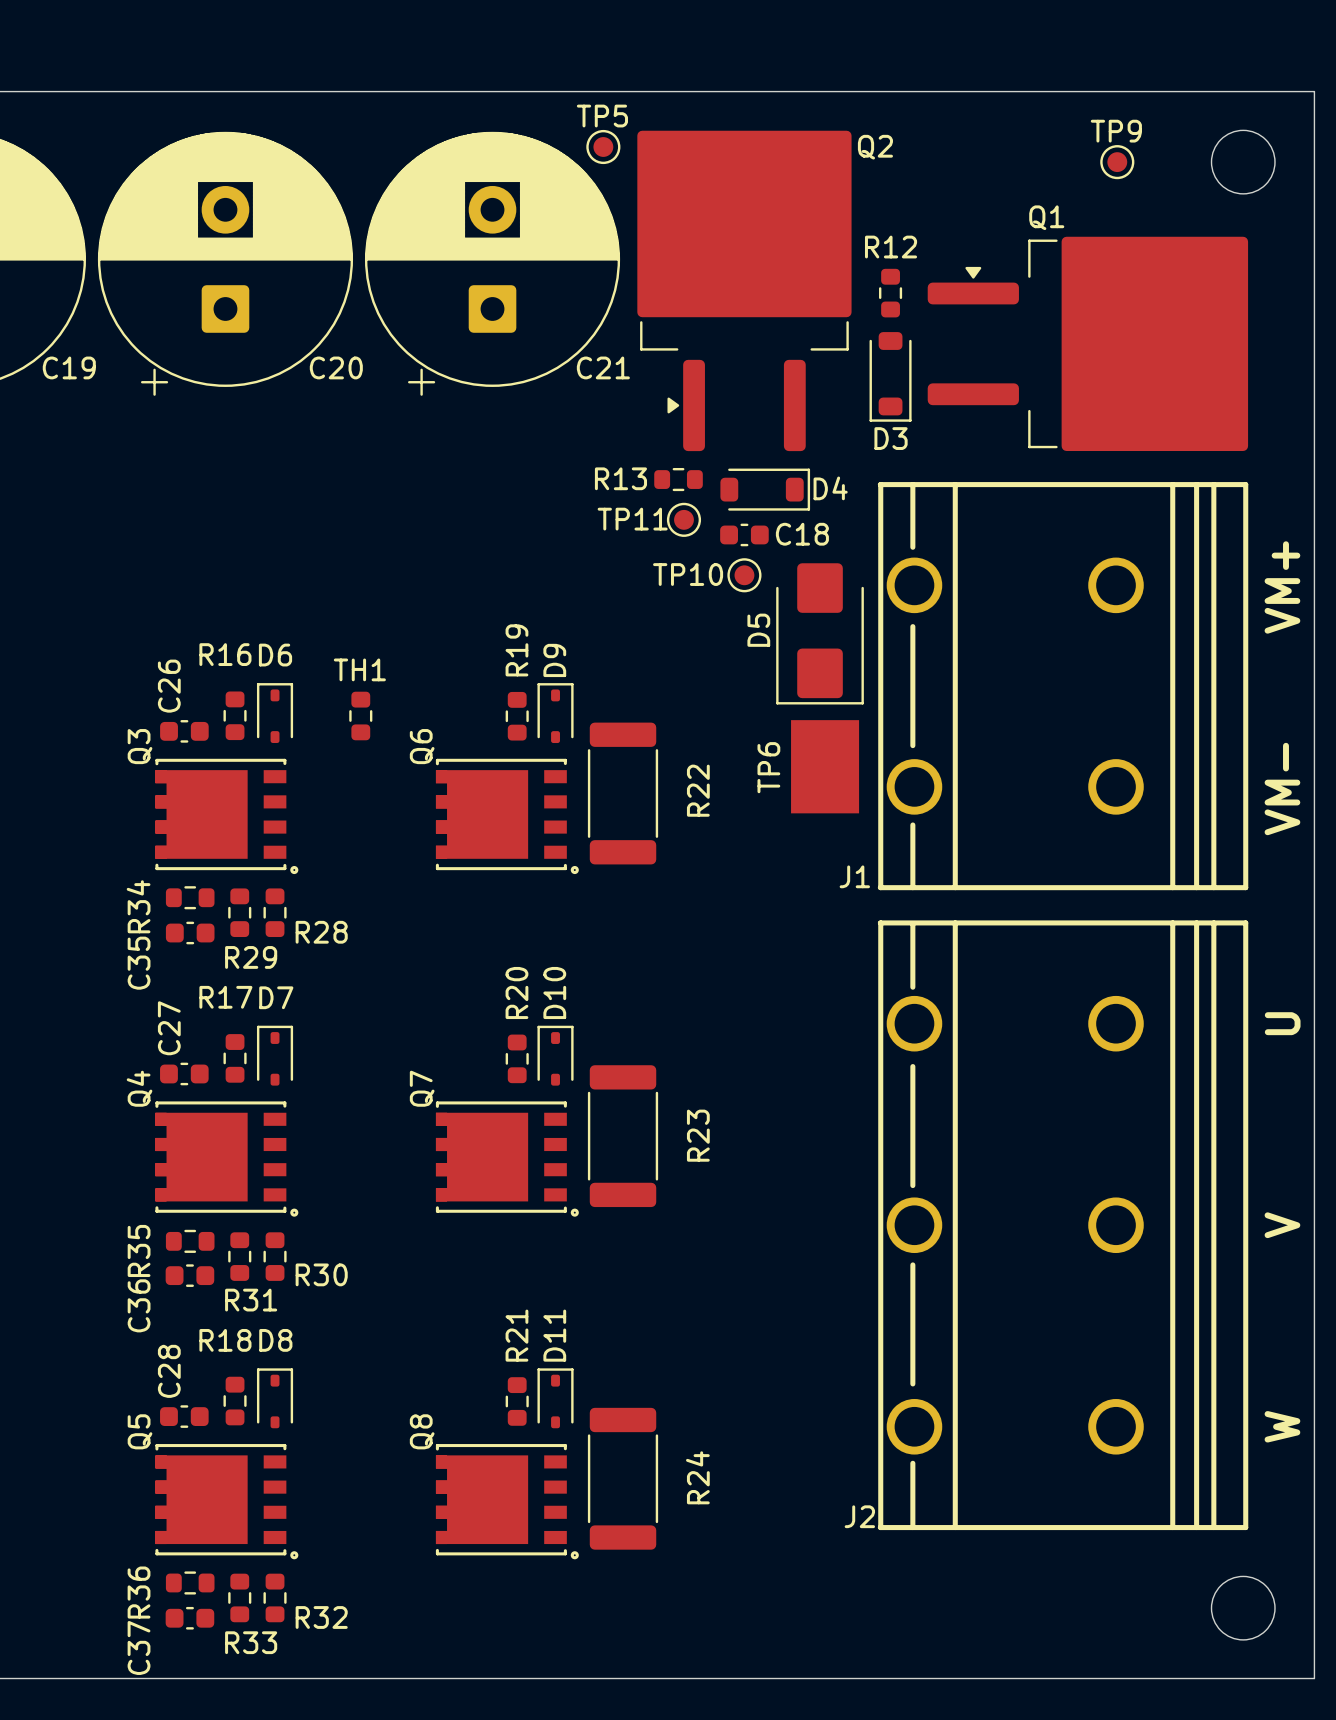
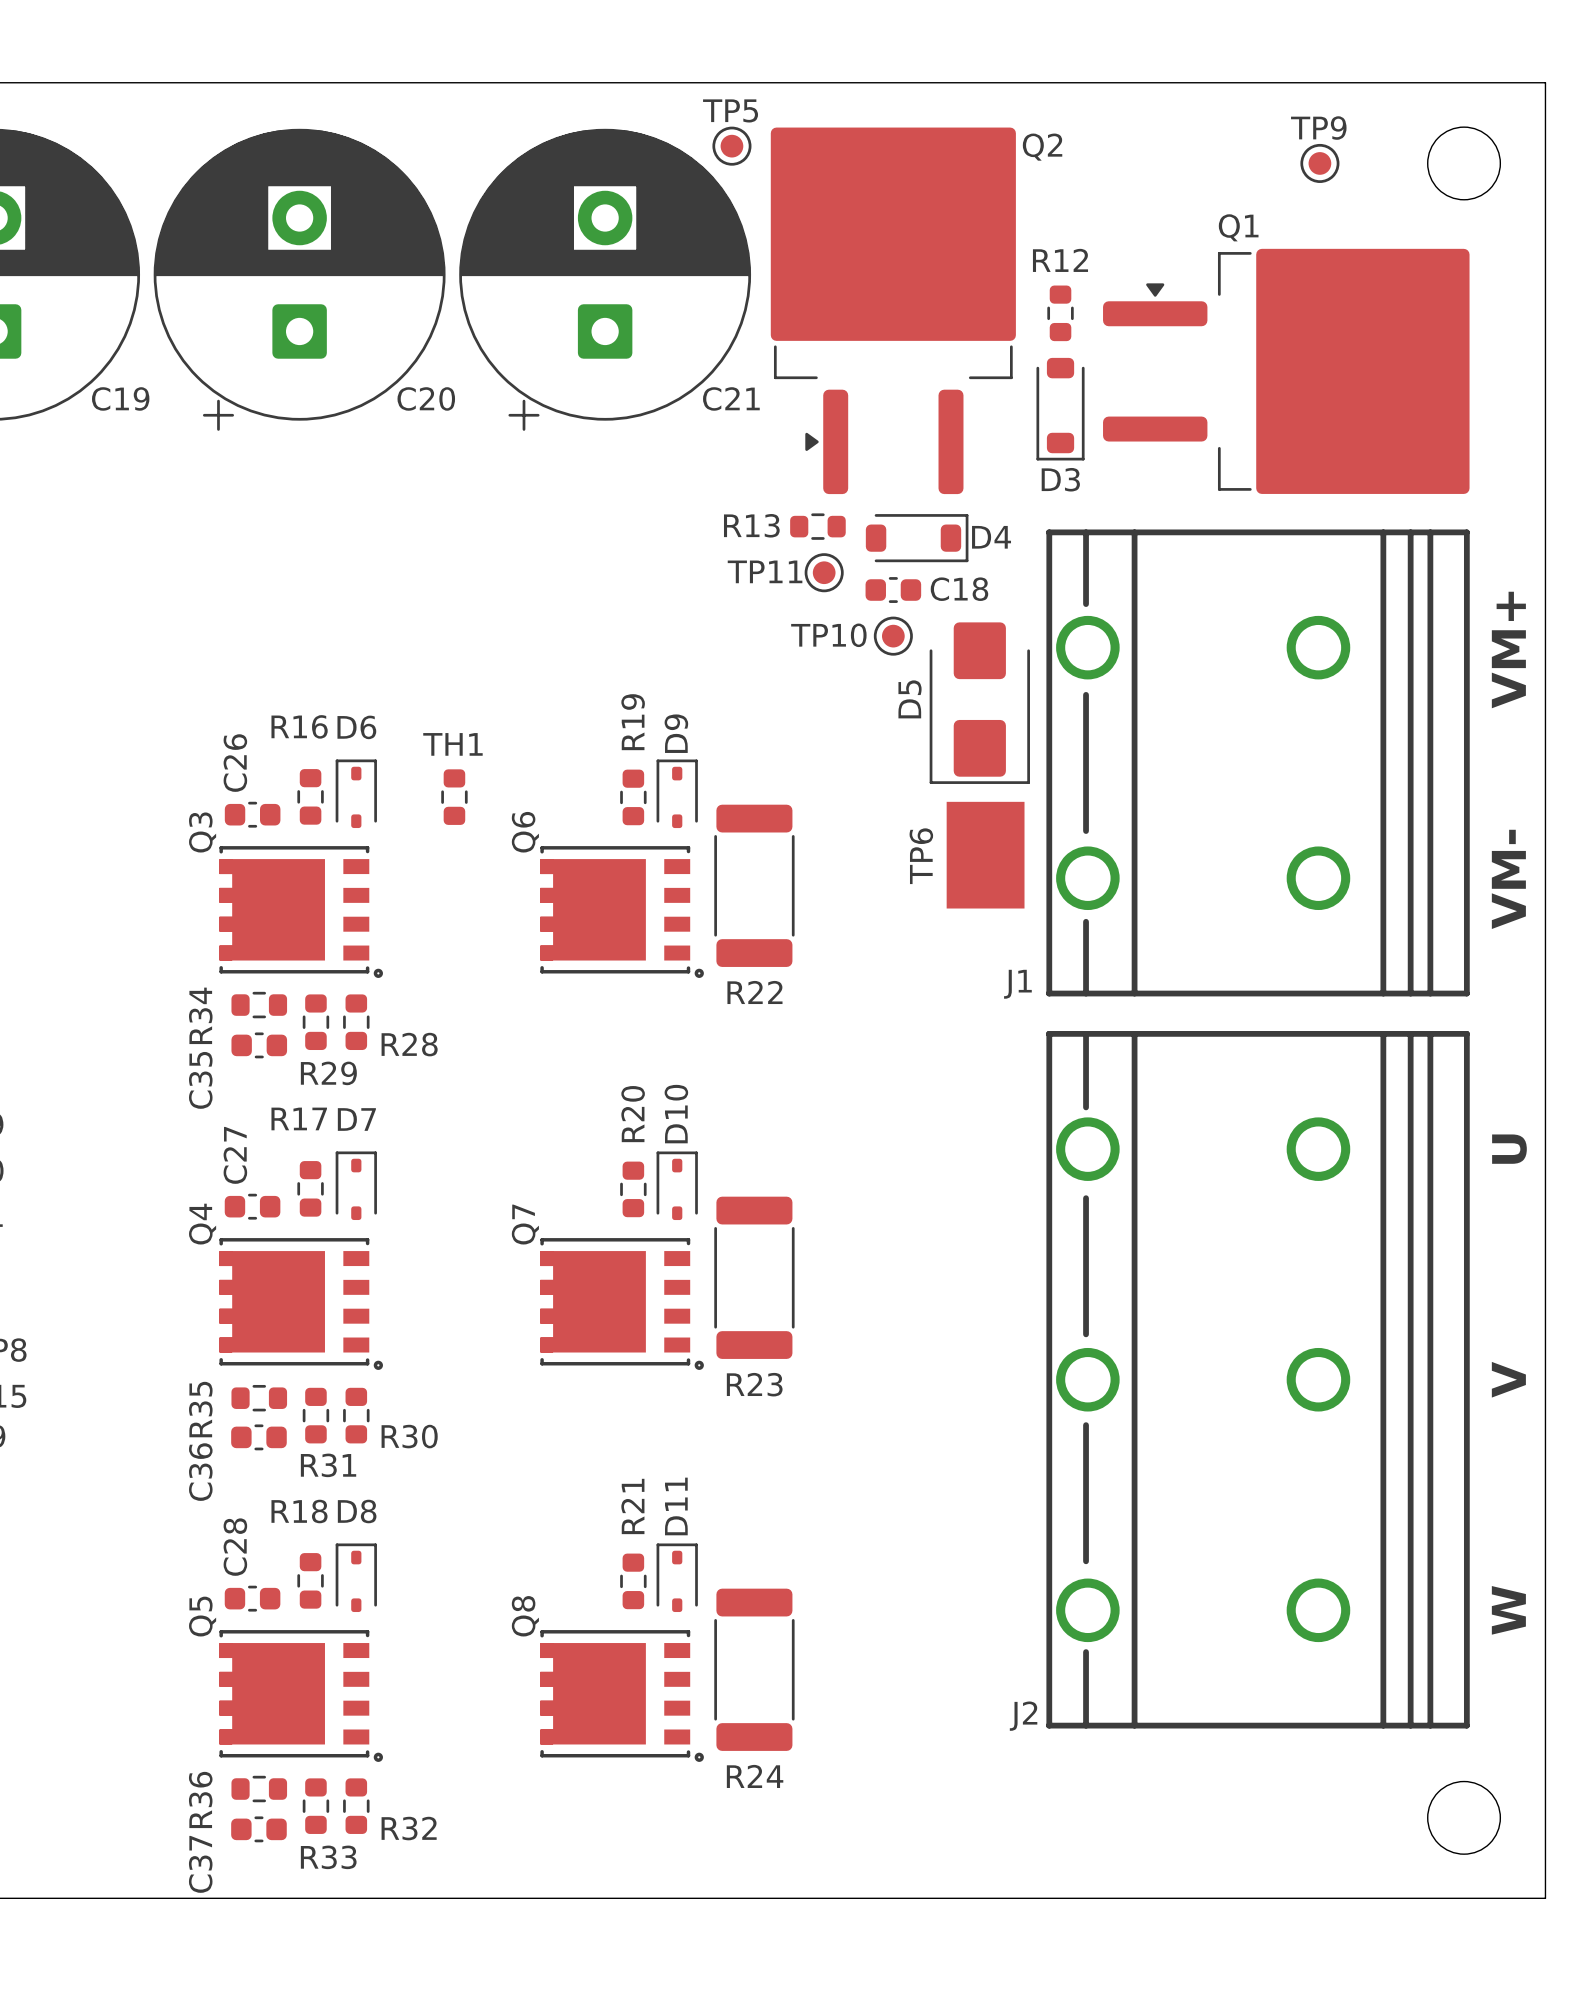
R22 name rotation: 0° (698, 790) -> 90° clockwise (754, 992)
R22 name position: R22 (698, 790) -> R22 (754, 992)
R23 name rotation: 0° (698, 1135) -> 90° clockwise (754, 1384)
R23 name position: R23 (698, 1135) -> R23 (754, 1384)
R24 name rotation: 0° (697, 1477) -> 90° clockwise (755, 1776)
R24 name position: R24 (697, 1477) -> R24 (755, 1776)

